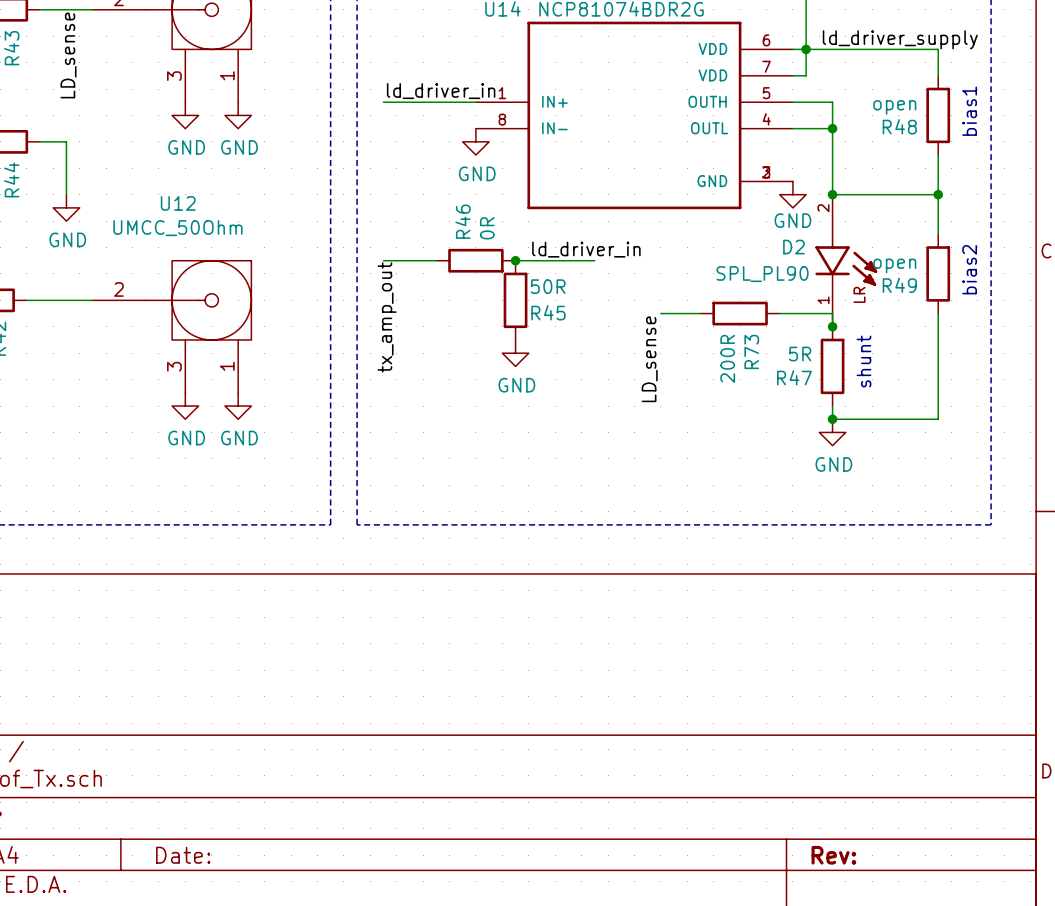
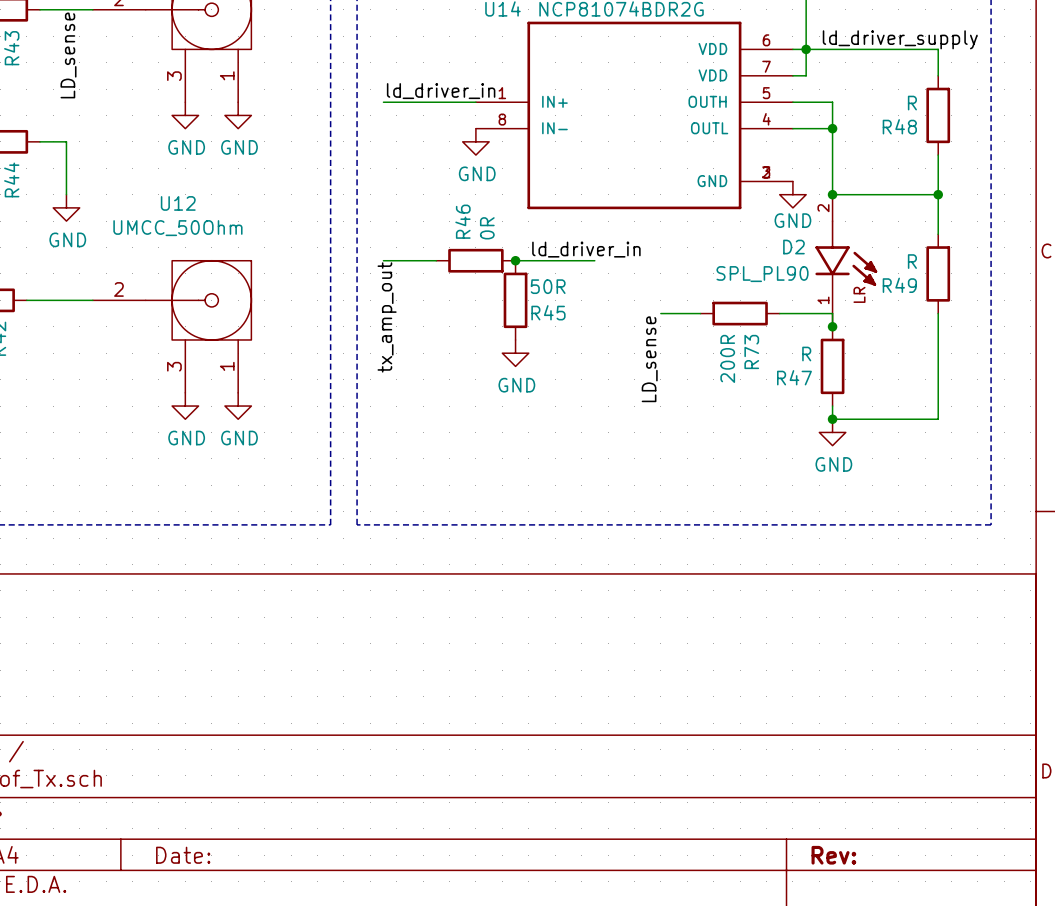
R48 value: open (894, 107) -> R (912, 103)
text: bias1 (969, 111) -> none
R49 value: open (894, 265) -> R (912, 261)
text: bias2 (969, 269) -> none
R47 value: 5R (800, 354) -> R (806, 354)
text: shunt (863, 361) -> none

